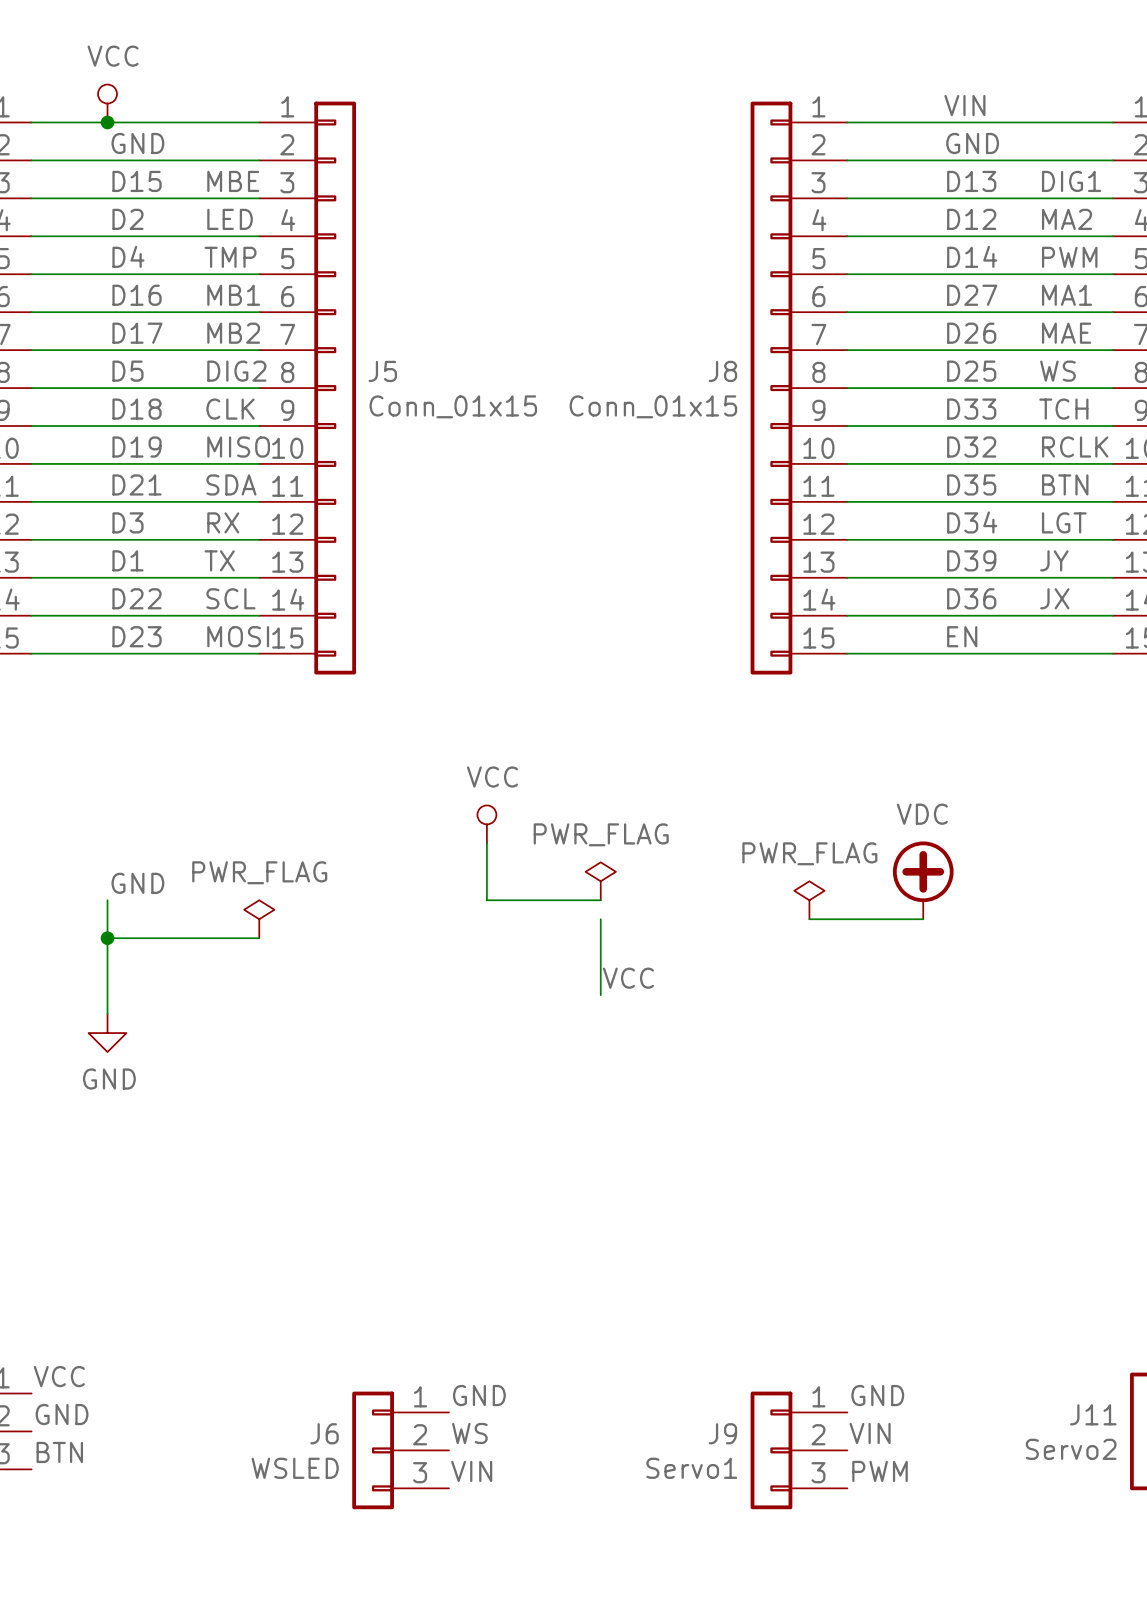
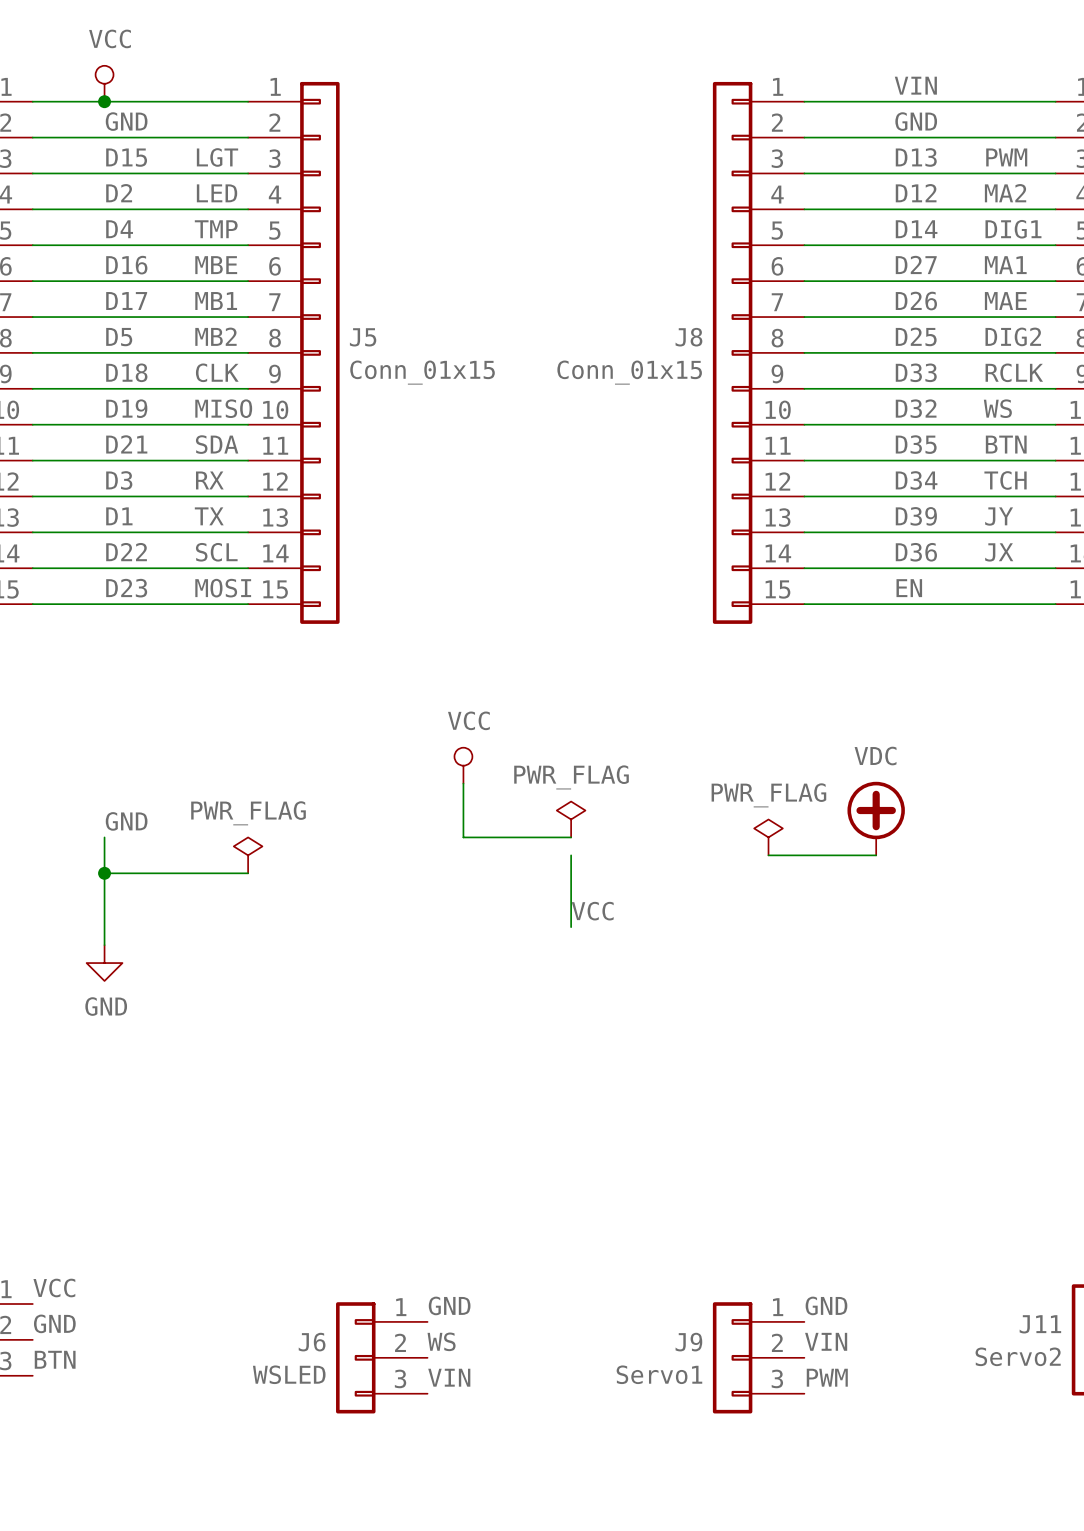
label: MBE (233, 181) -> LGT (217, 157)
label: DIG1 (1071, 181) -> PWM (1006, 157)
label: PWM (1069, 257) -> DIG1 (1013, 229)
label: MB1 (233, 295) -> MBE (216, 265)
label: MB2 (233, 333) -> MB1 (216, 301)
label: DIG2 (236, 371) -> MB2 (215, 336)
label: WS (1057, 371) -> DIG2 (1013, 336)
label: TCH (1063, 409) -> RCLK (1014, 372)
label: RCLK (1075, 447) -> WS (997, 408)
label: LGT (1064, 522) -> TCH (1005, 480)

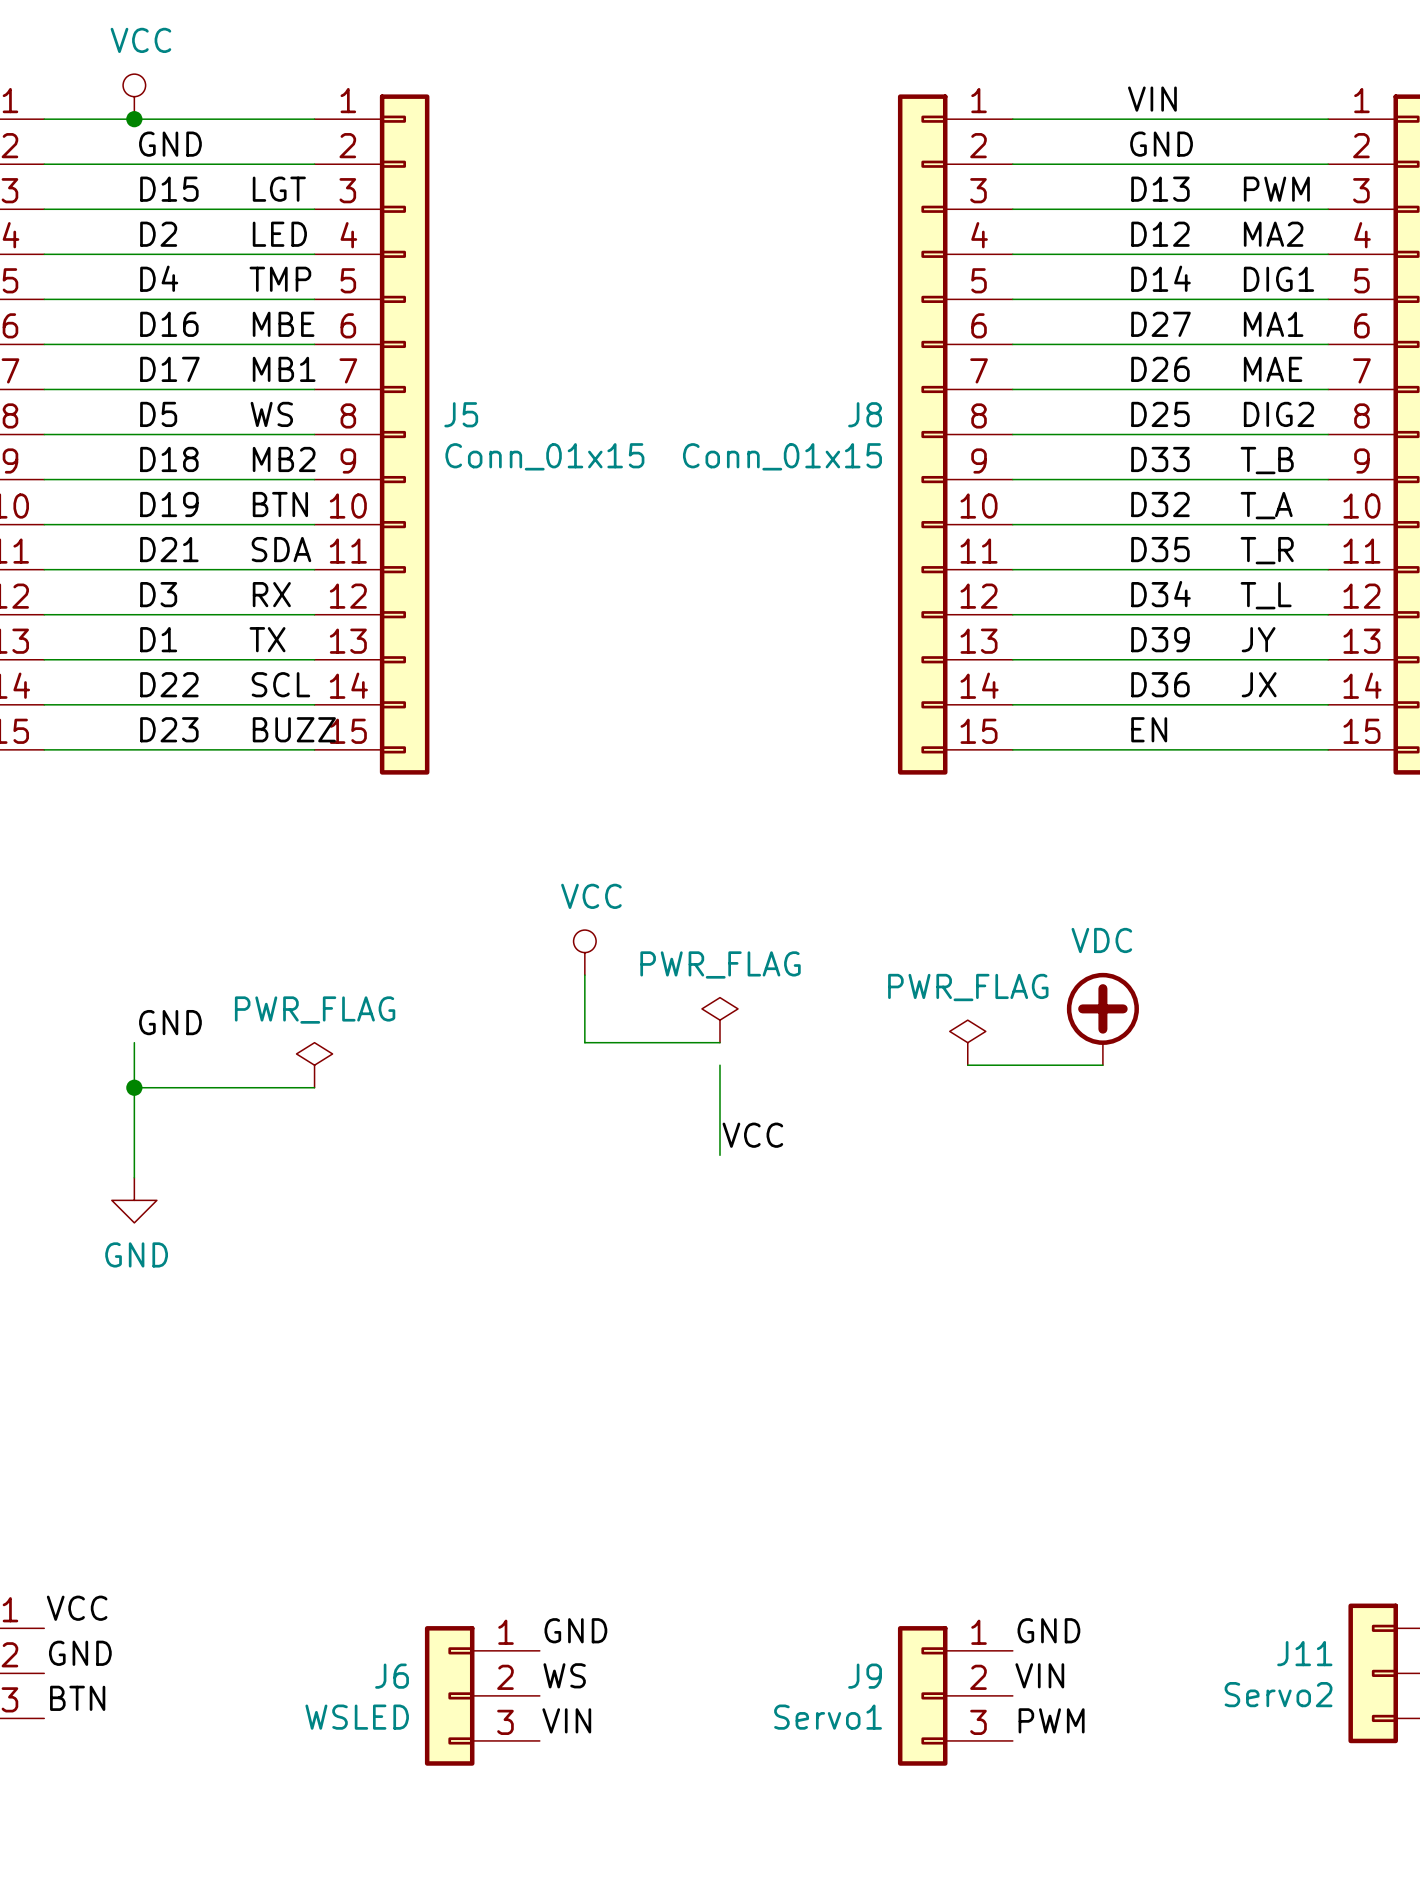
label: MB2 (215, 336) -> WS (271, 414)
label: CLK (217, 372) -> MB2 (284, 459)
label: RCLK (1014, 372) -> T_B (1267, 460)
label: MISO (223, 408) -> BTN (280, 504)
label: WS (997, 408) -> T_A (1266, 505)
label: BTN (1006, 444) -> T_R (1267, 550)
label: TCH (1005, 480) -> T_L (1266, 595)
label: MOSI (223, 588) -> BUZZ (294, 729)

